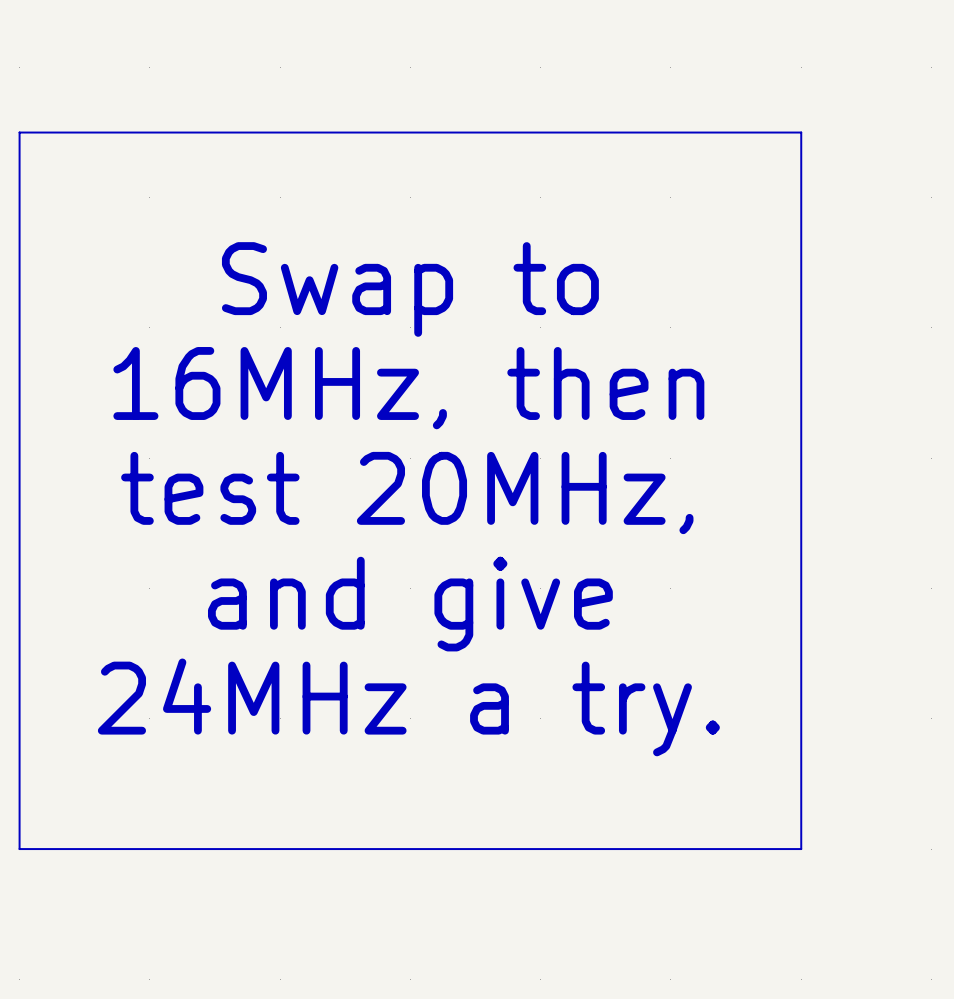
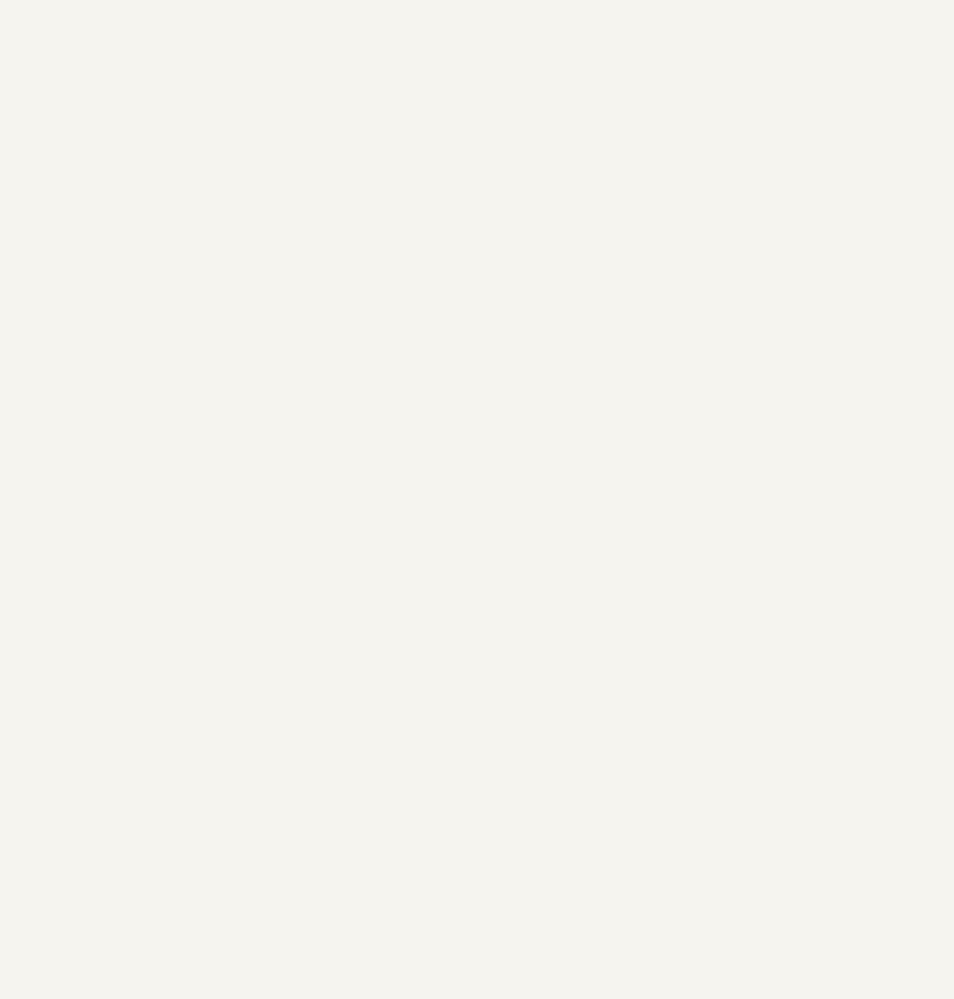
line: (19, 132) (801, 132) (801, 849) (19, 849) (19, 132) -> none
text: Swap to (410, 289) -> none
text: 16MHz, then (408, 388) -> none
text: test 20MHz, (407, 493) -> none
text: and give (410, 604) -> none
text: 24MHz a try. (408, 707) -> none

